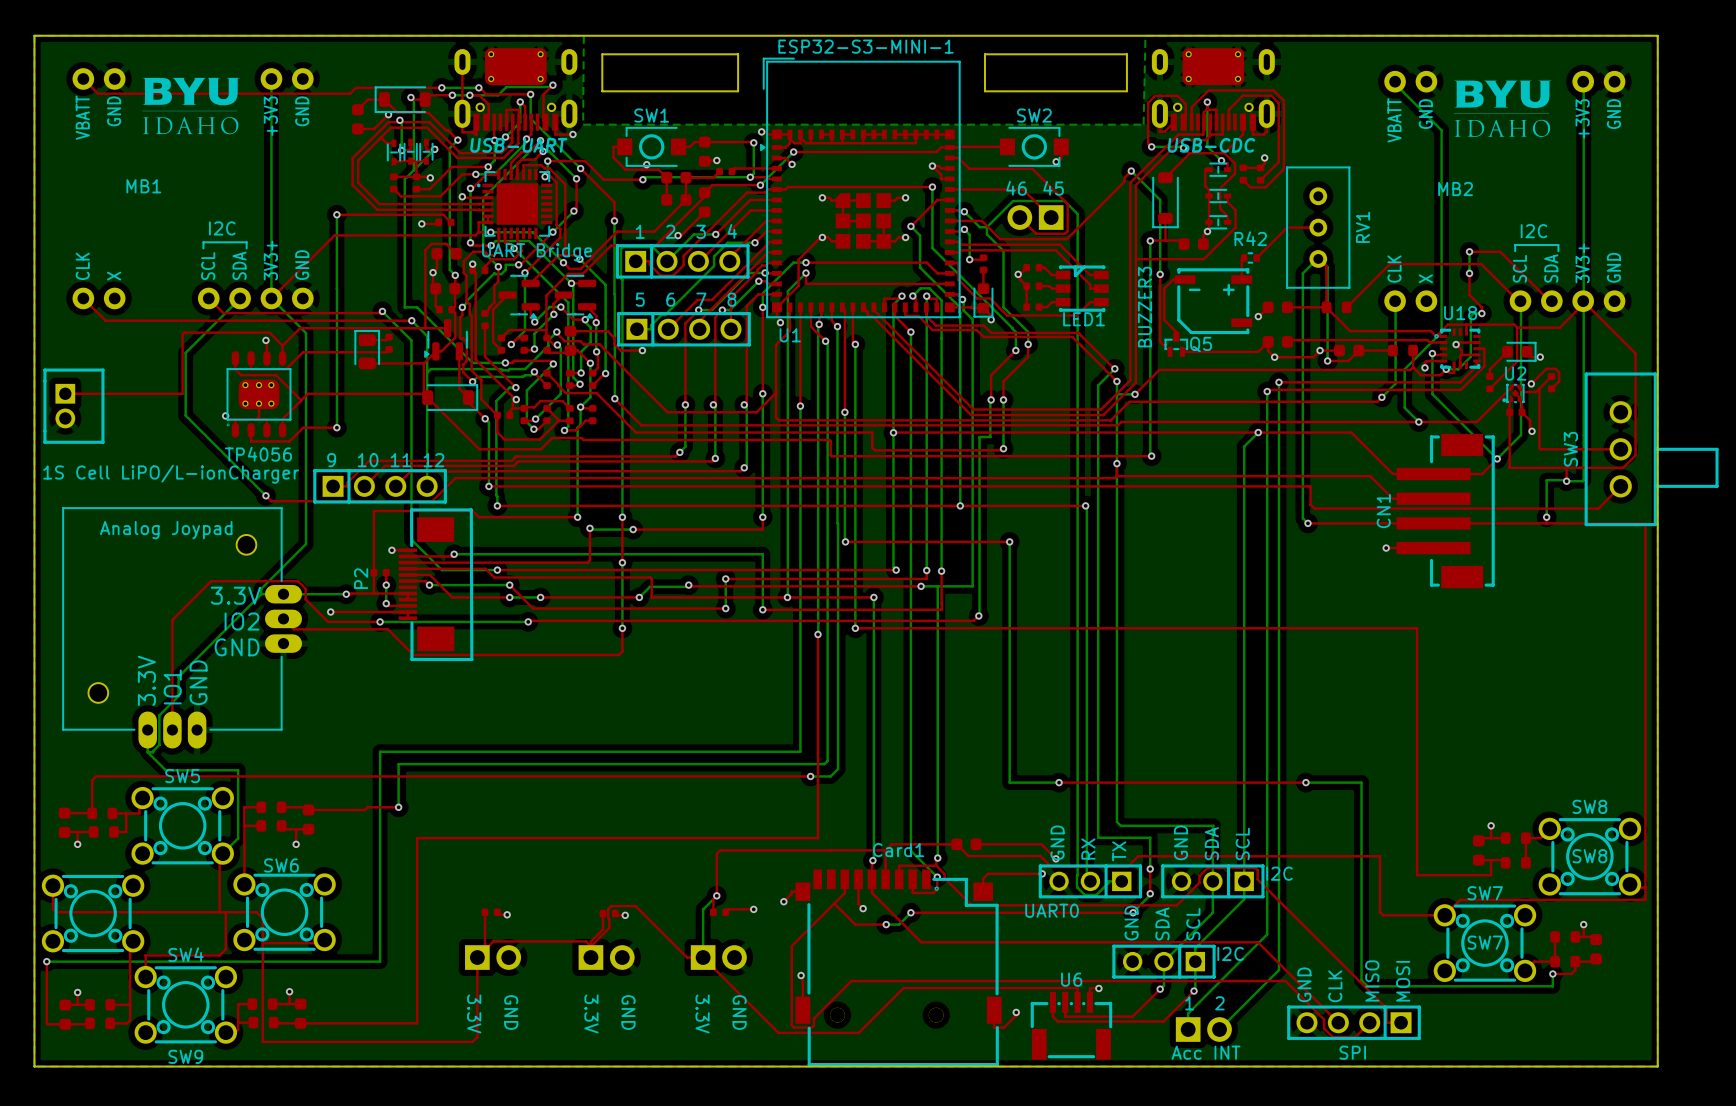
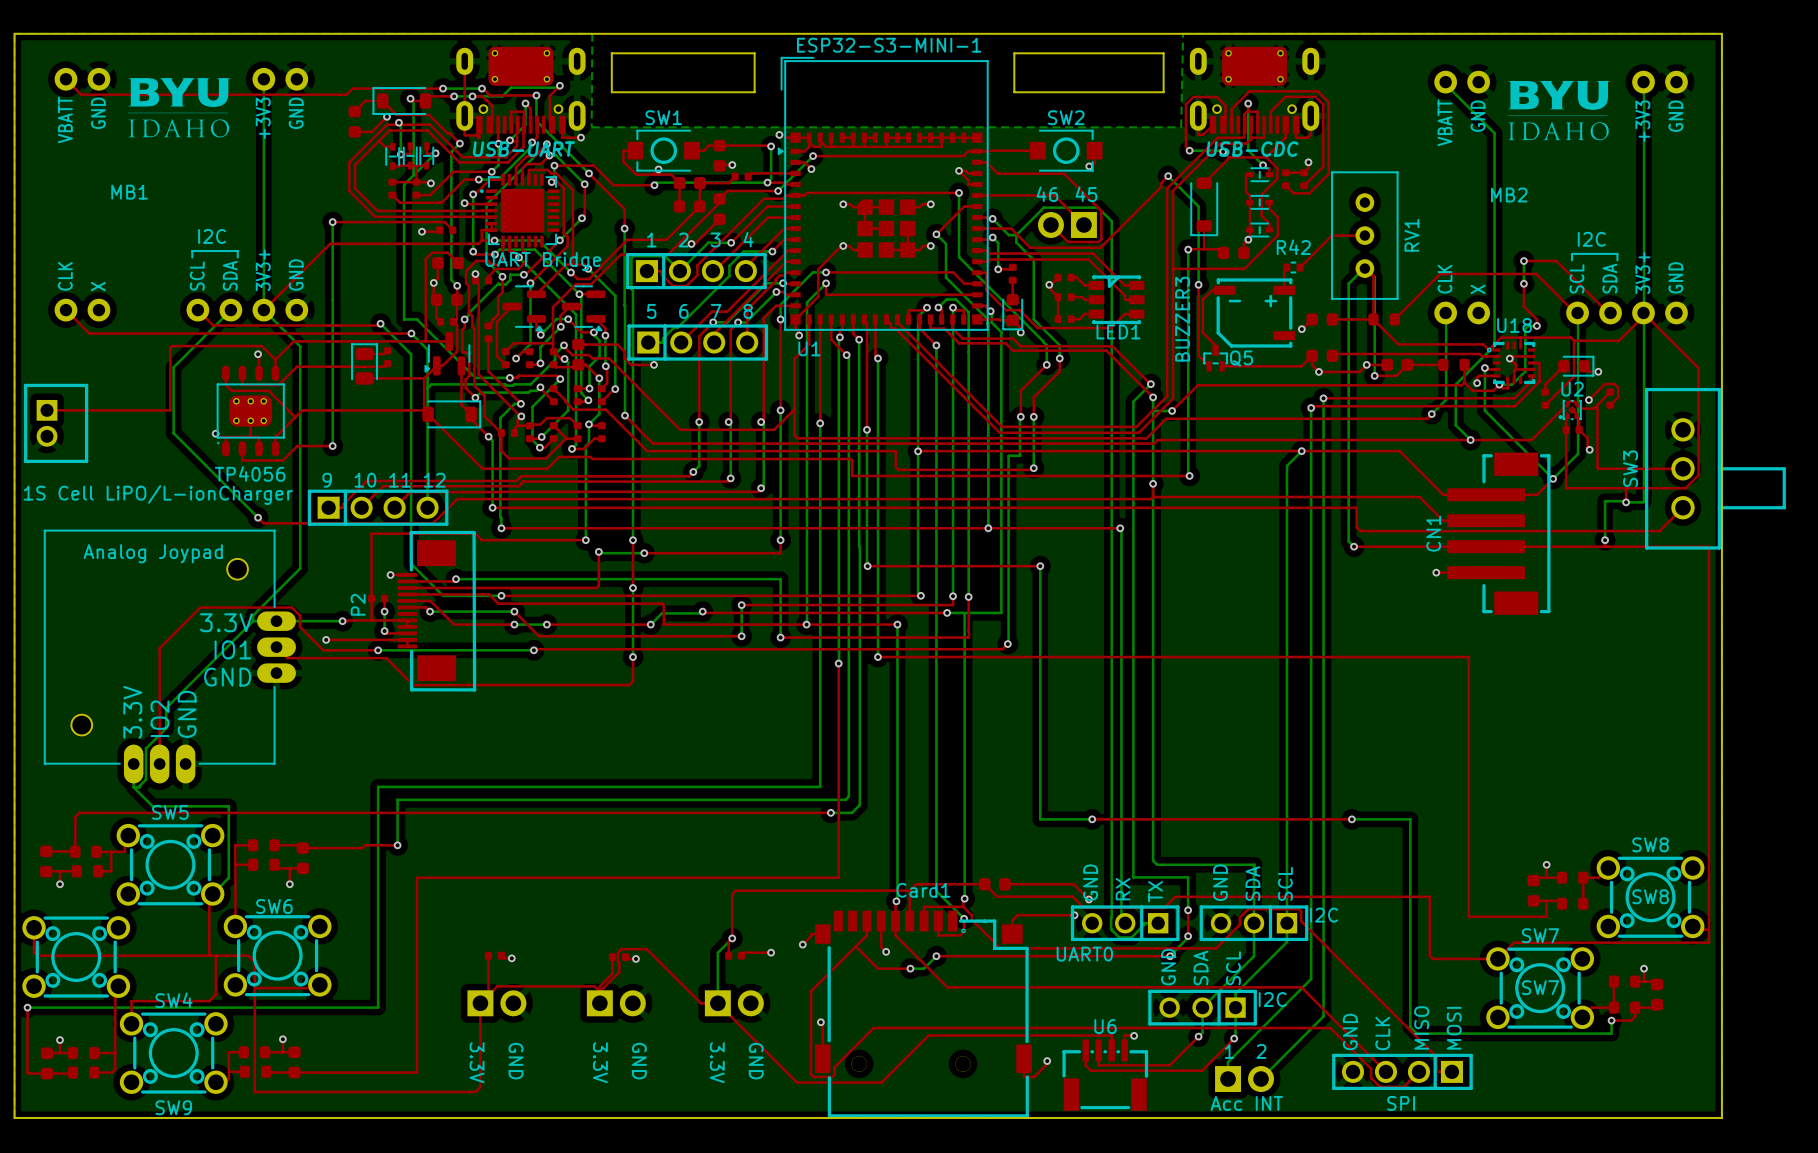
text: IO2 (242, 621) -> IO1 (232, 649)
text: IO1 (172, 686) -> IO2 (159, 718)

